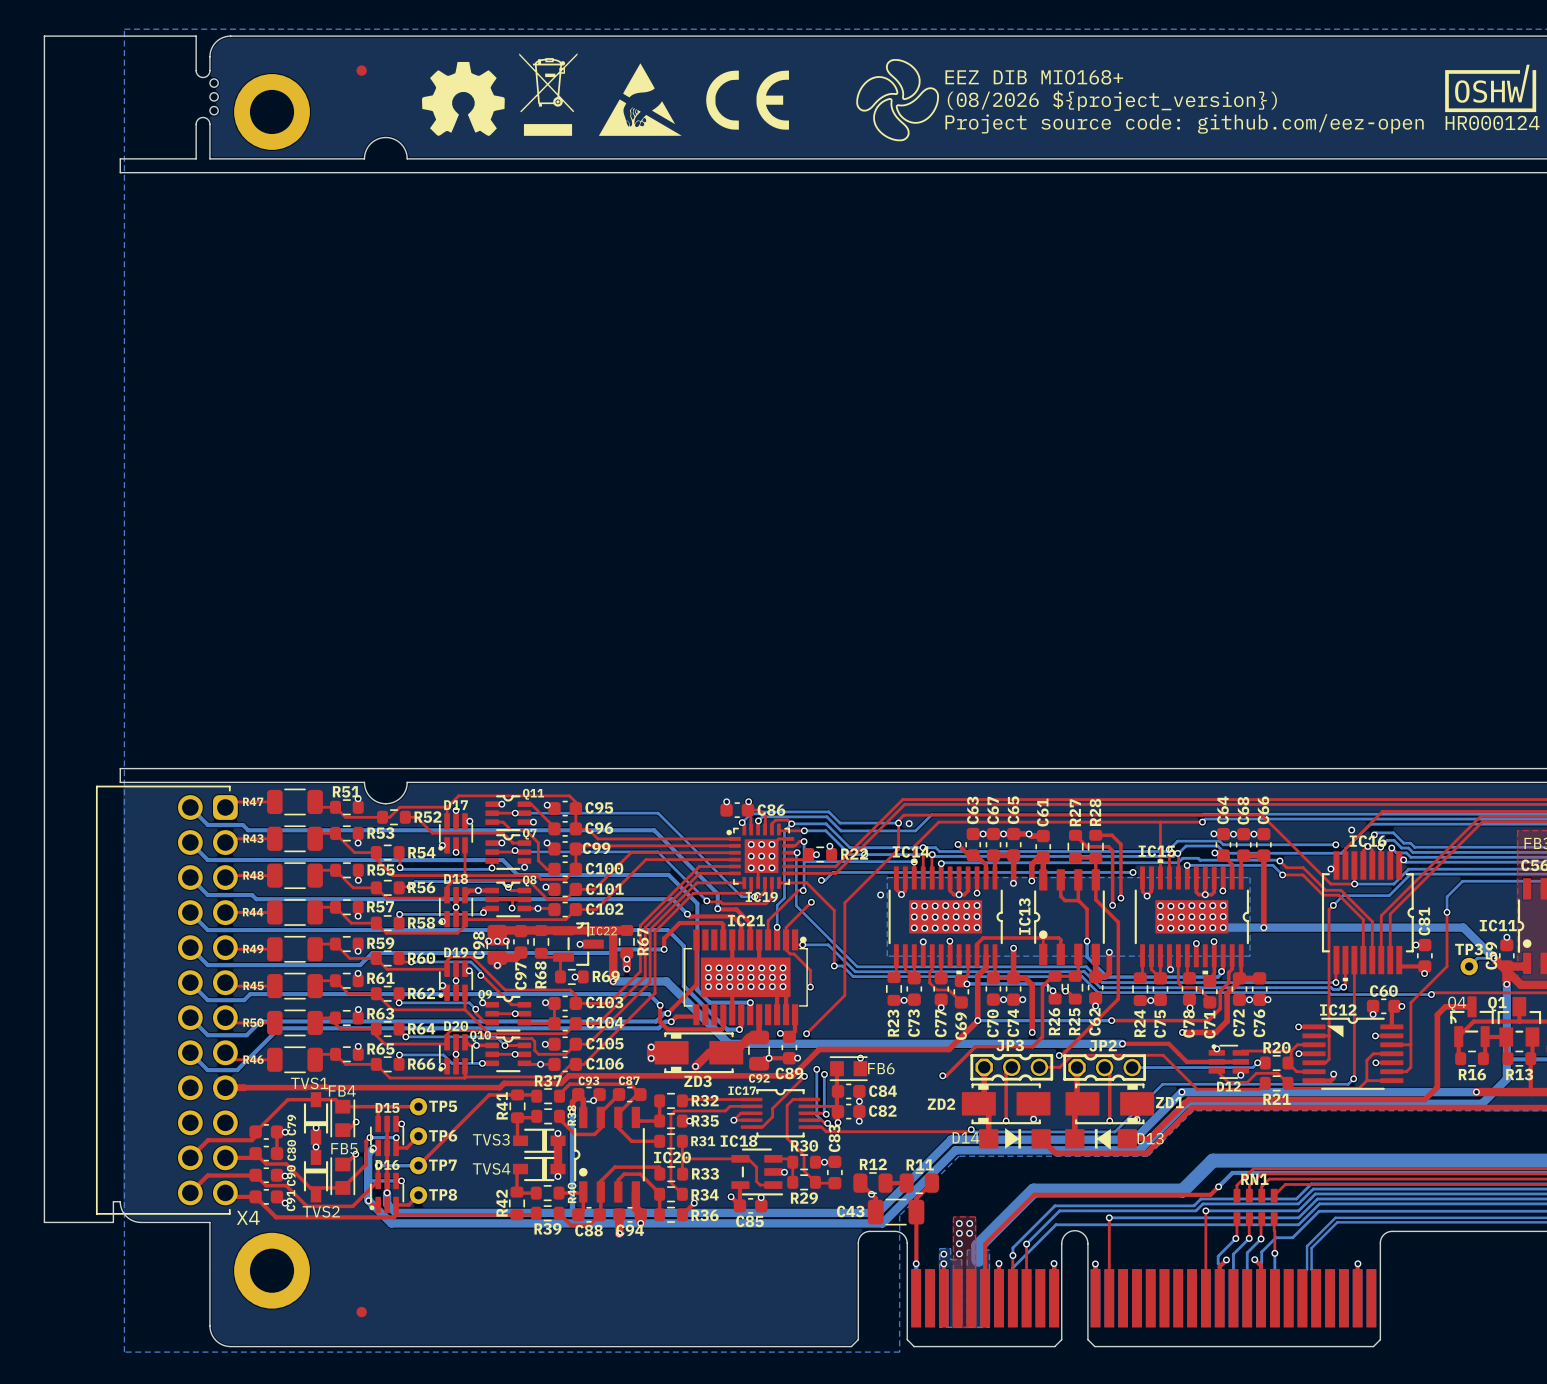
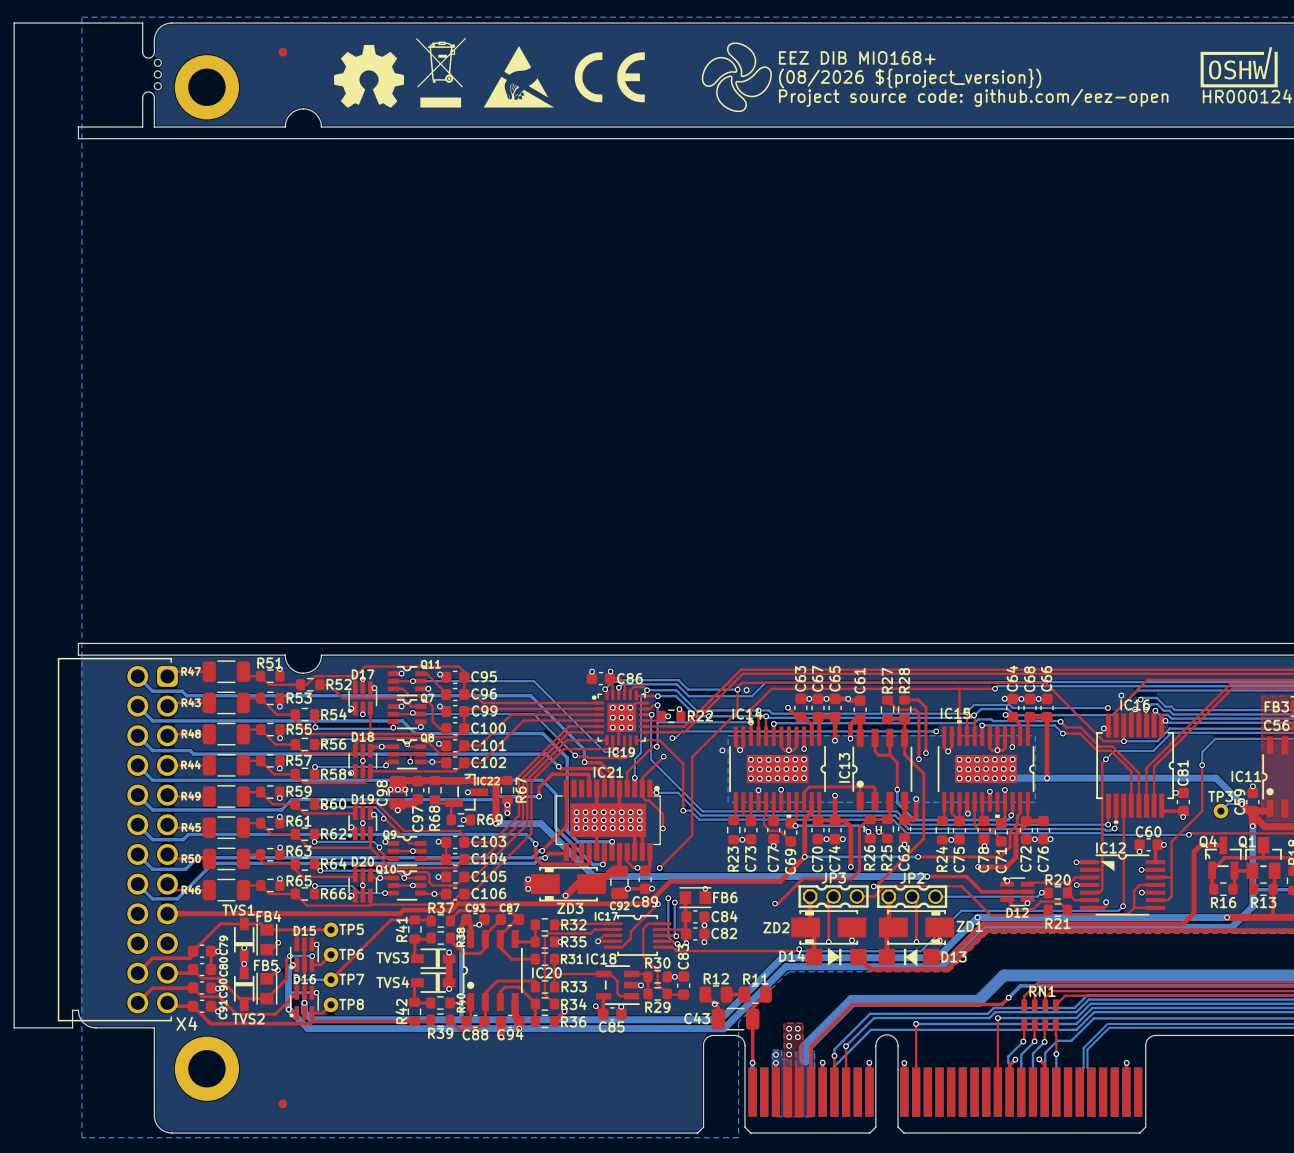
top track: none -> (627, 851) (627, 861) (633, 867) (637, 867)

